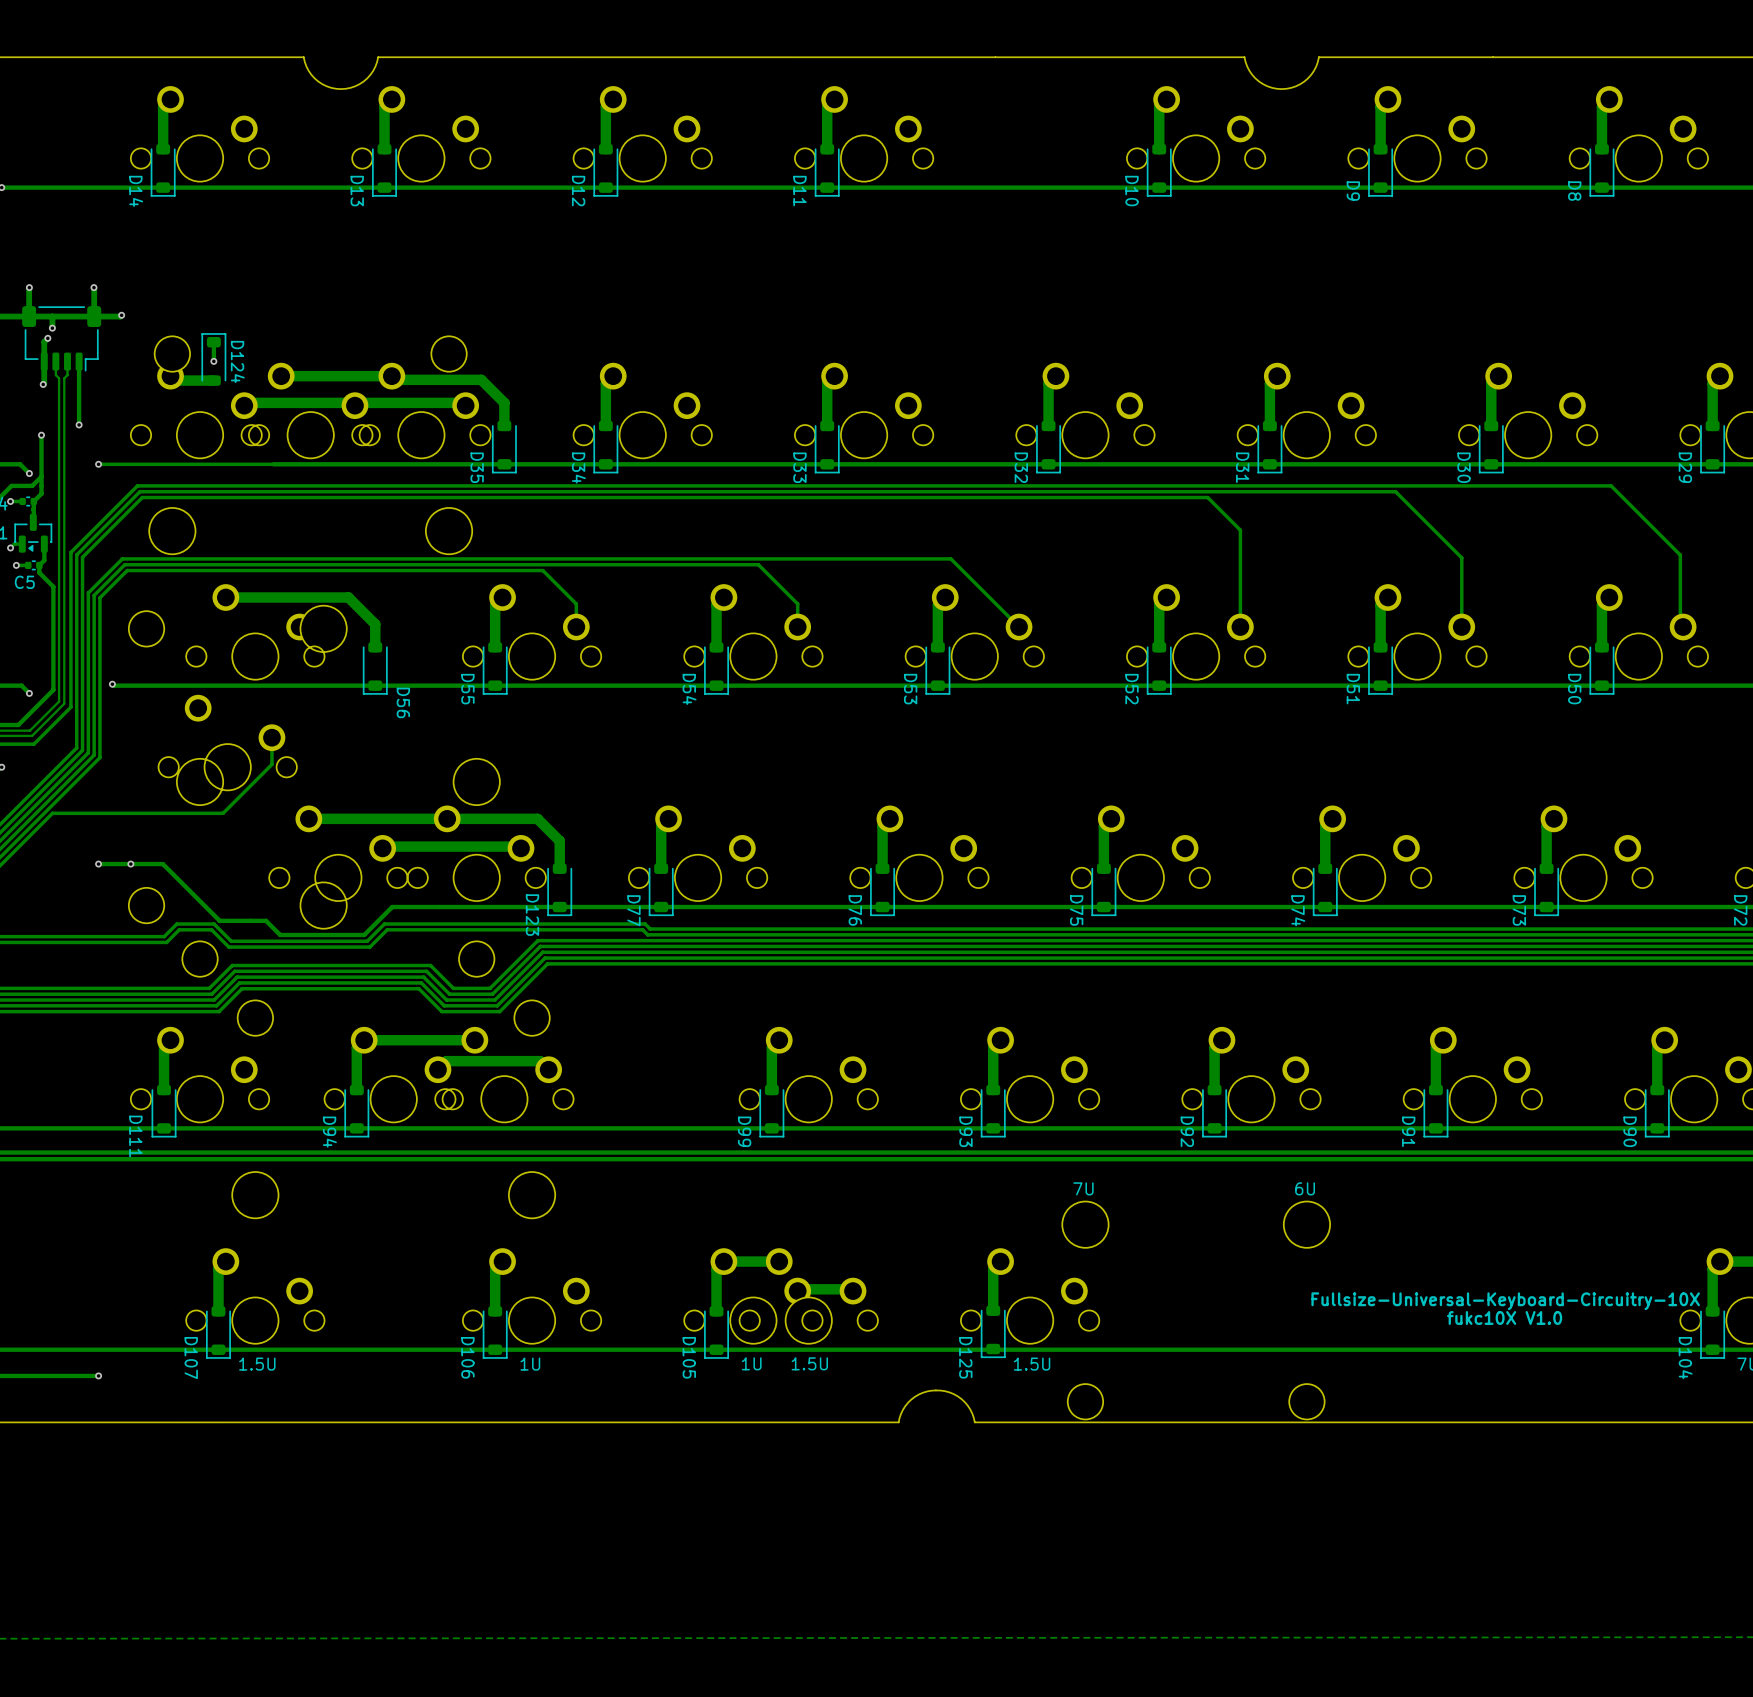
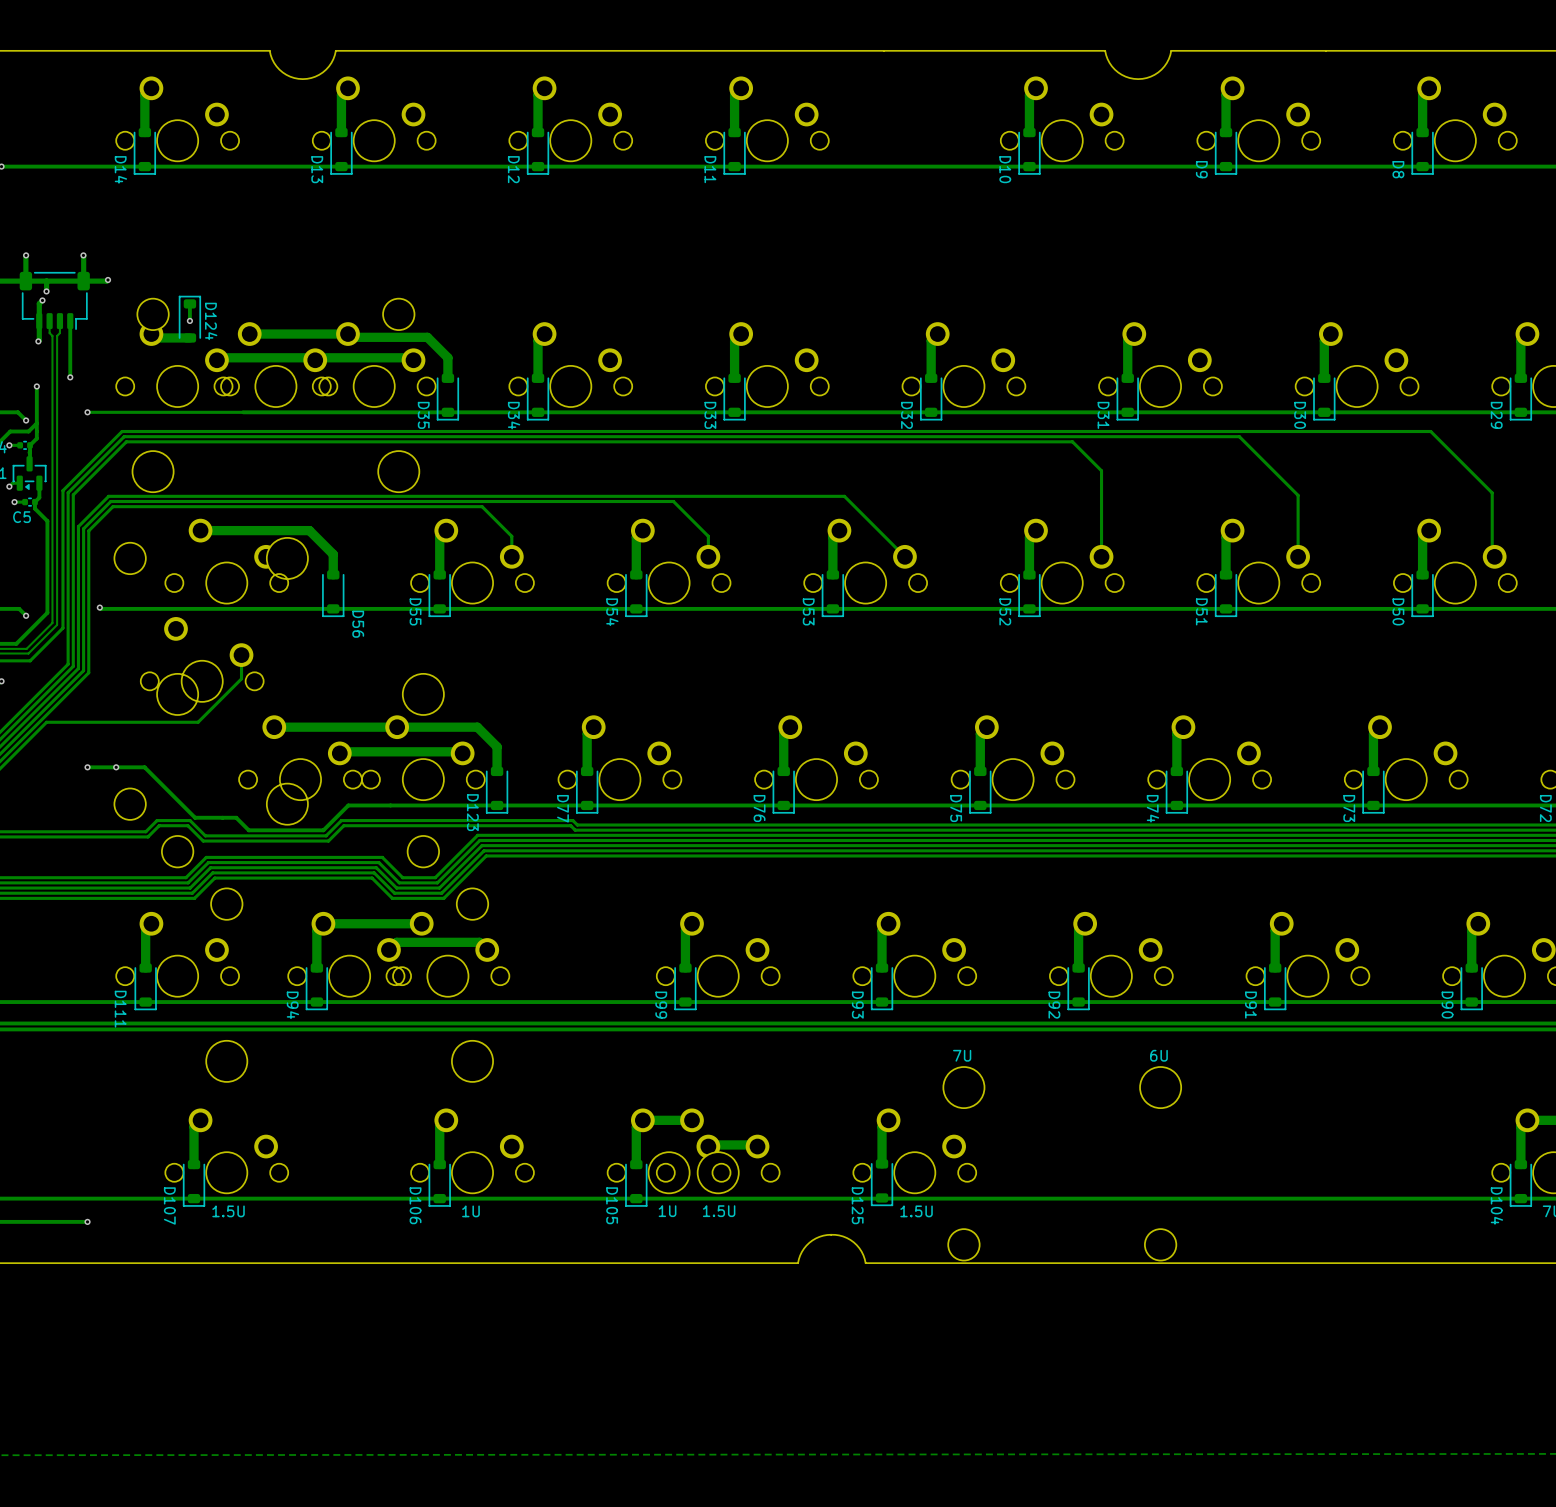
text: Fullsize-Universal-Keyboard-Circuitry-10X (1505, 1301) -> none
text: fukc10X V1.0 (1504, 1317) -> none

